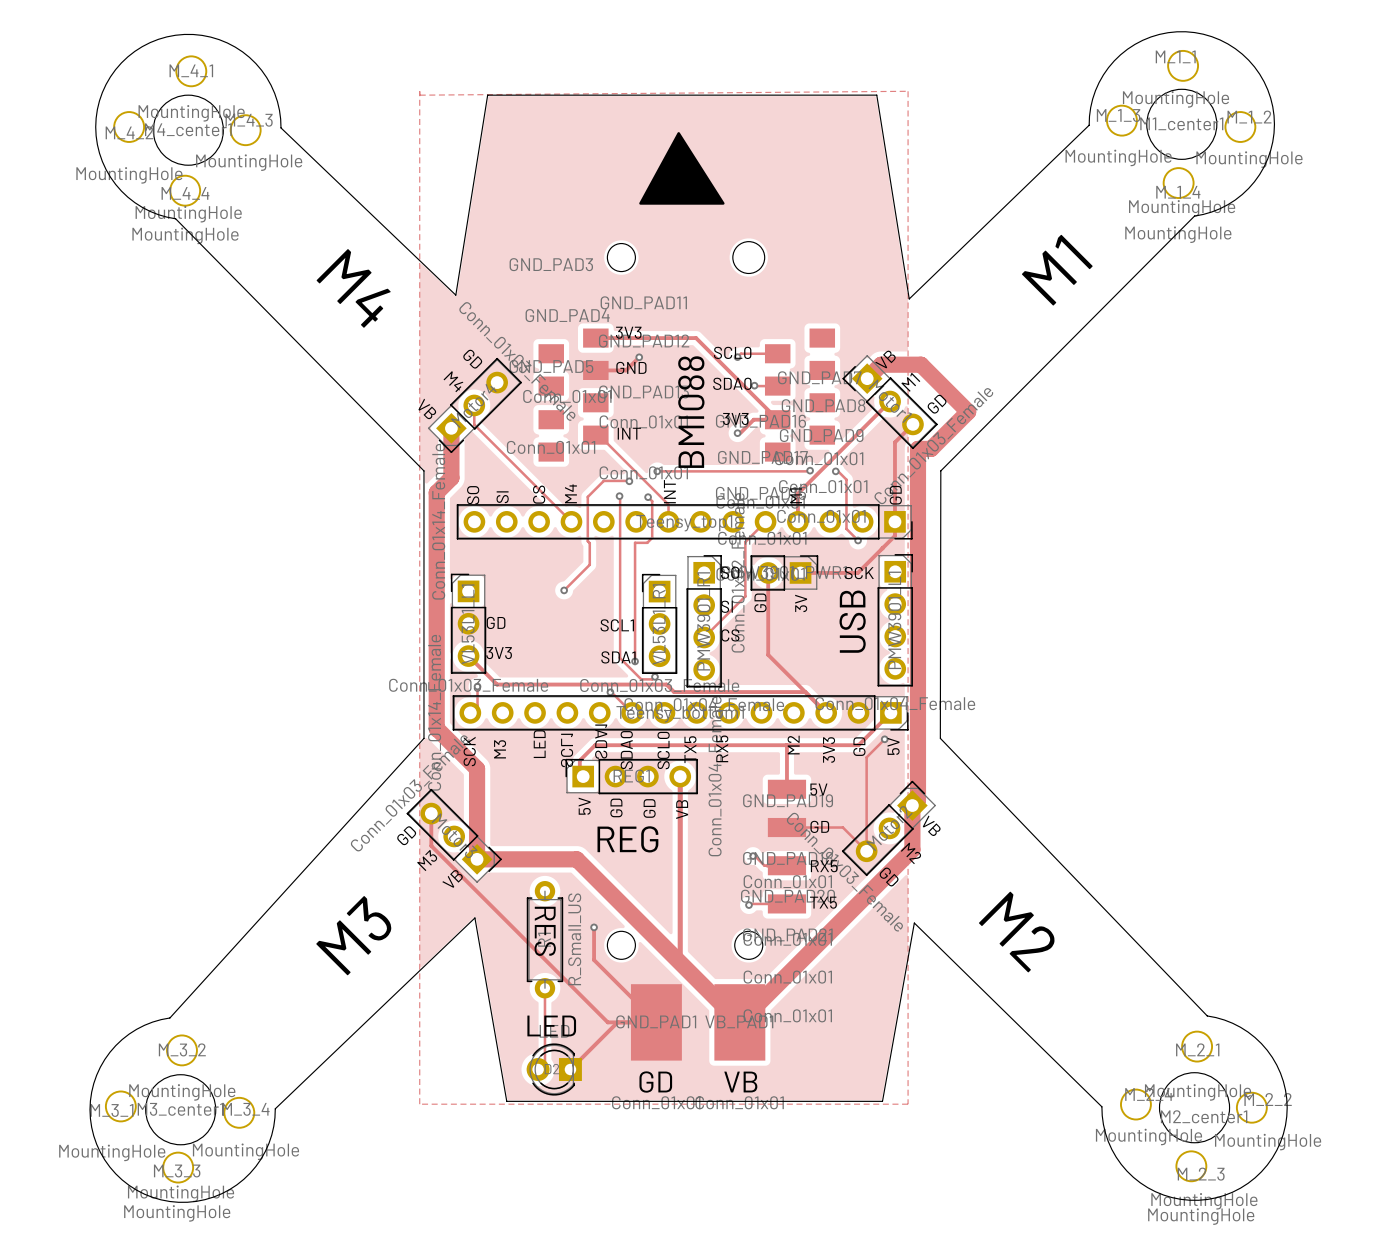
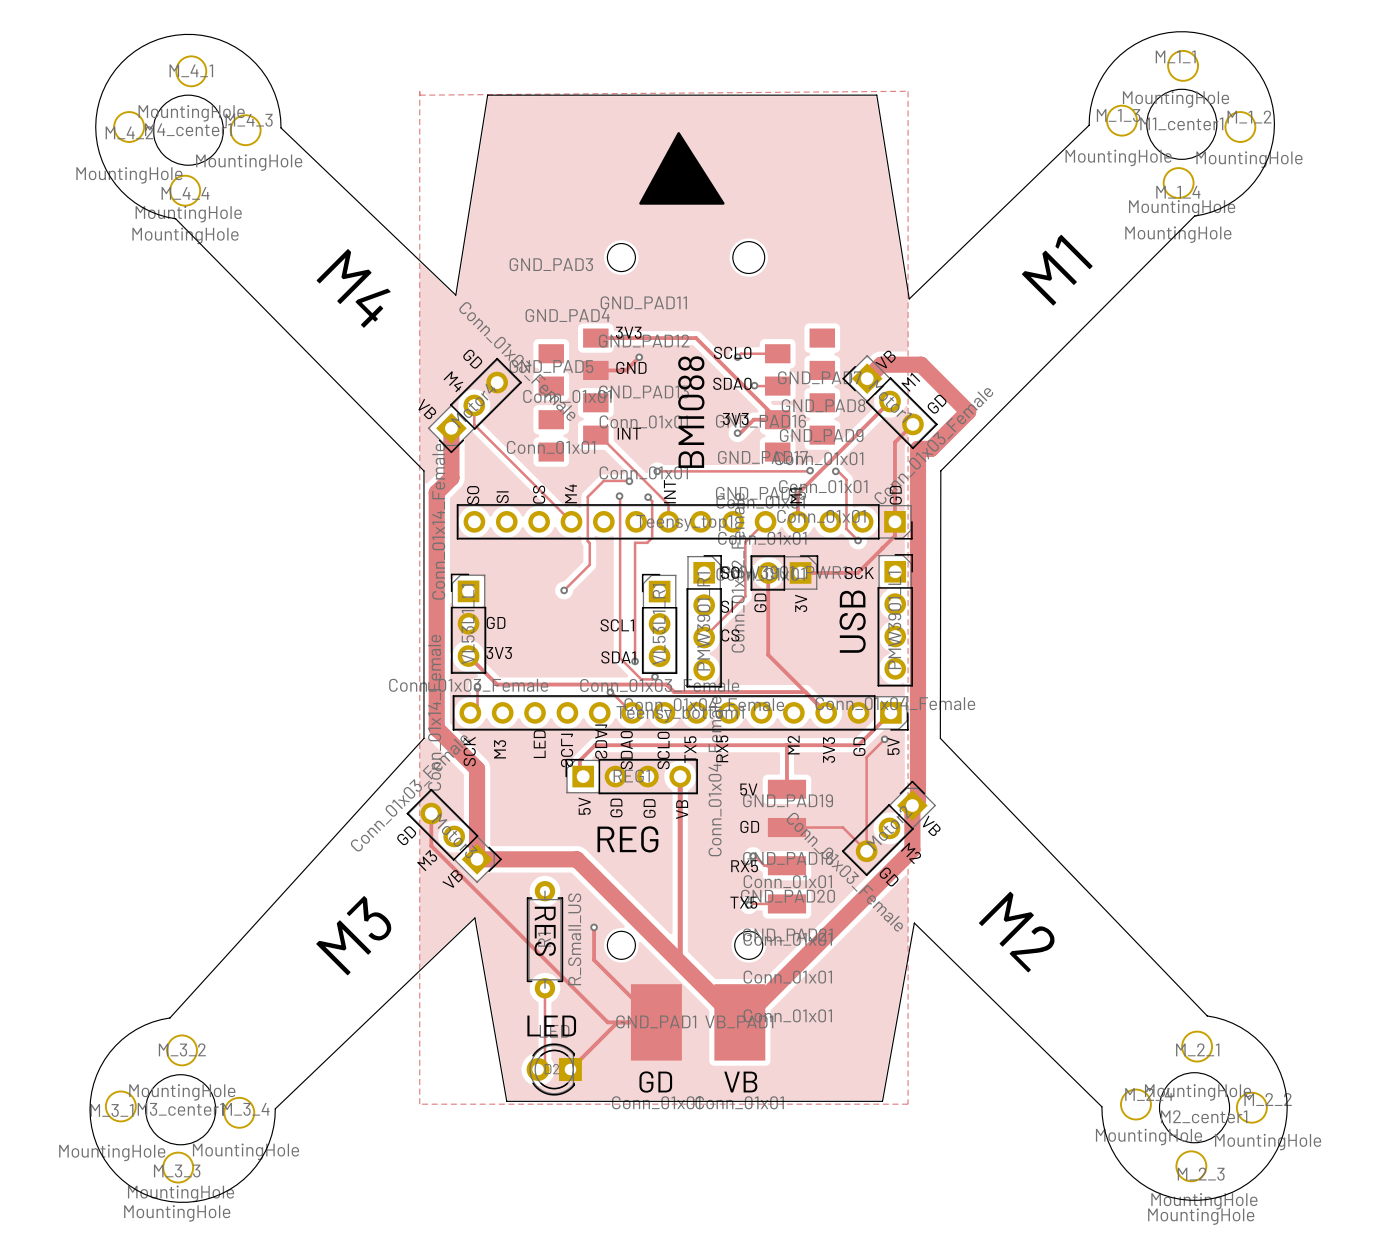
text position: 5V (818, 789) -> 5V (748, 789)
text position: GD (819, 826) -> GD (749, 826)
text position: RX5 (824, 866) -> RX5 (744, 866)
text position: TX5 (823, 902) -> TX5 (743, 902)

